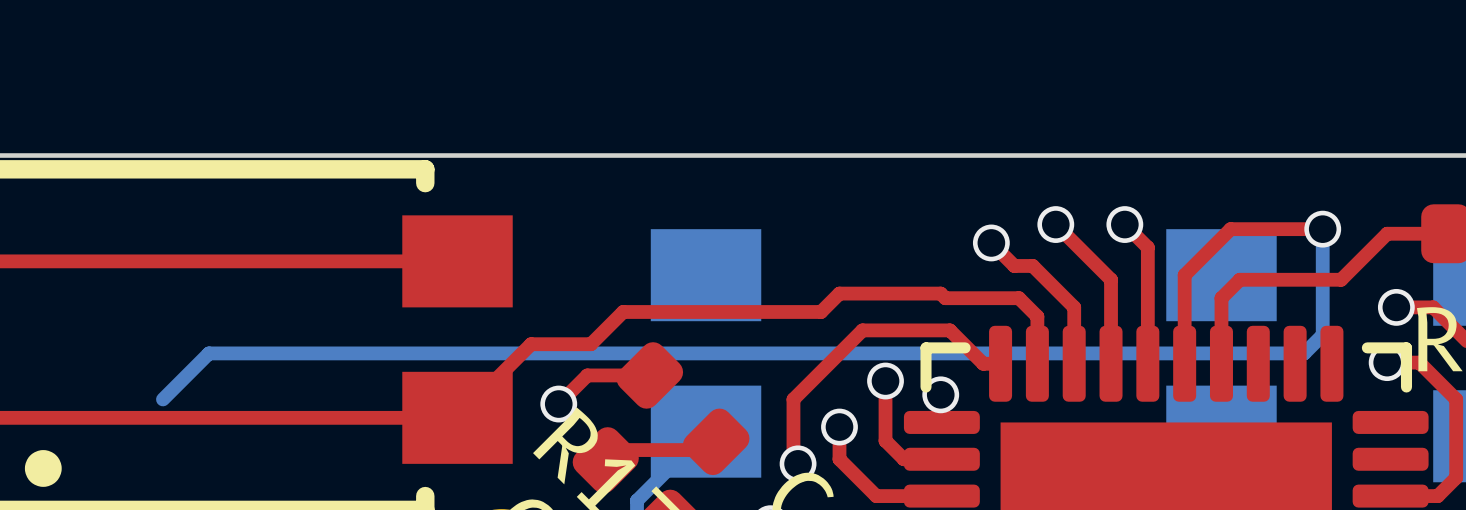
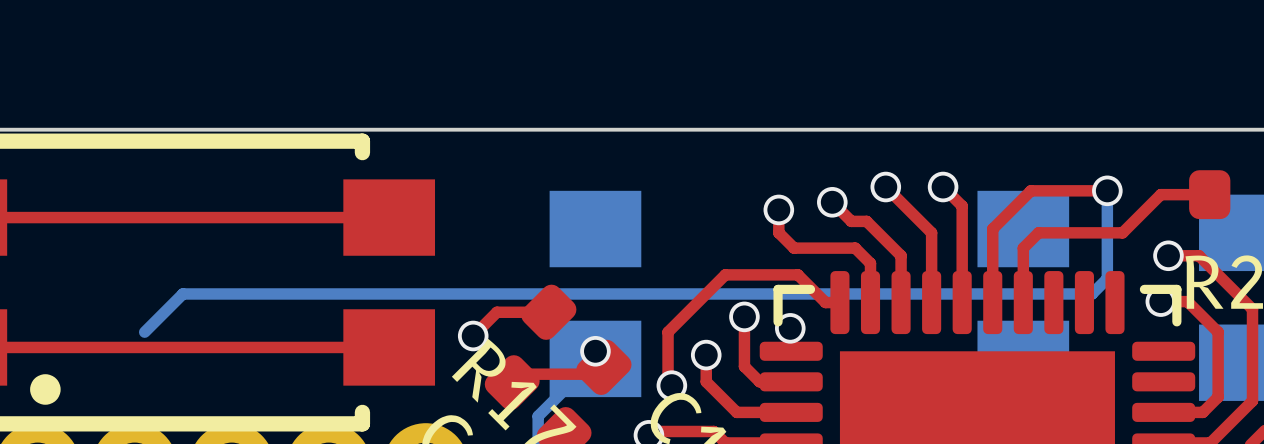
via: none -> (778, 209)
top track: (940, 293) (839, 293) (821, 311) (623, 311) (590, 344) (531, 344) (457, 417) -> (790, 244) (778, 232) (778, 209)
via: none -> (595, 351)

